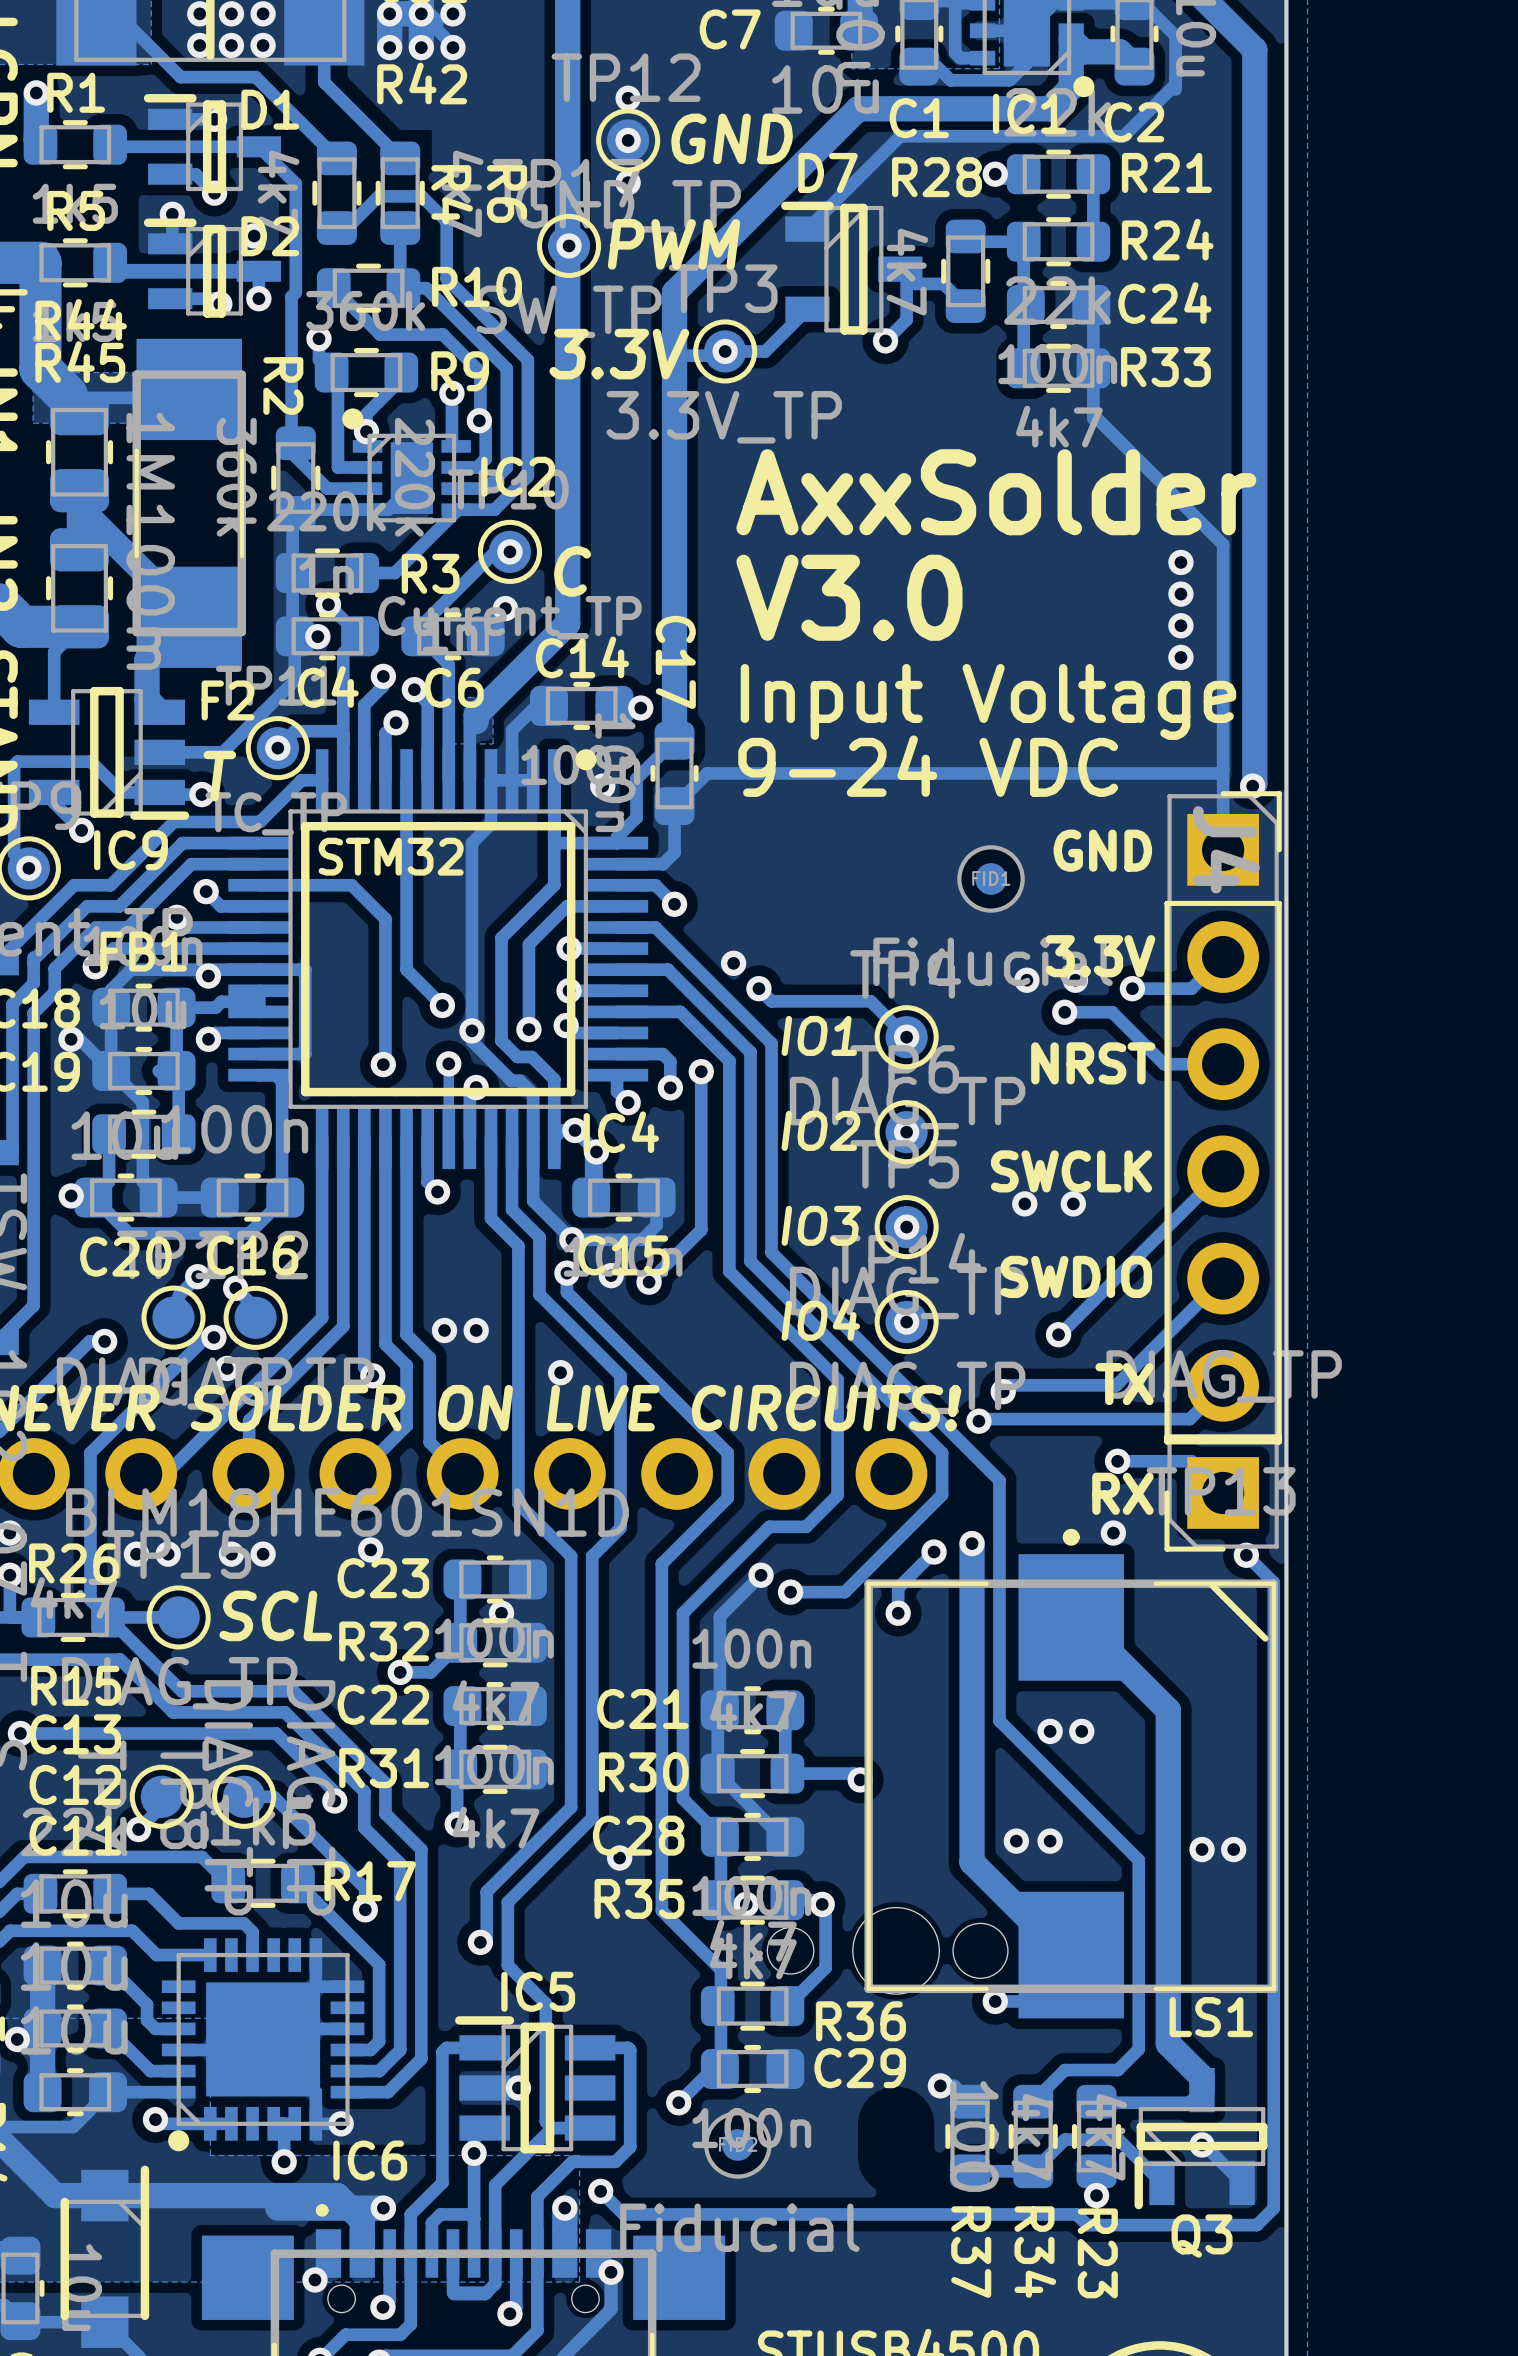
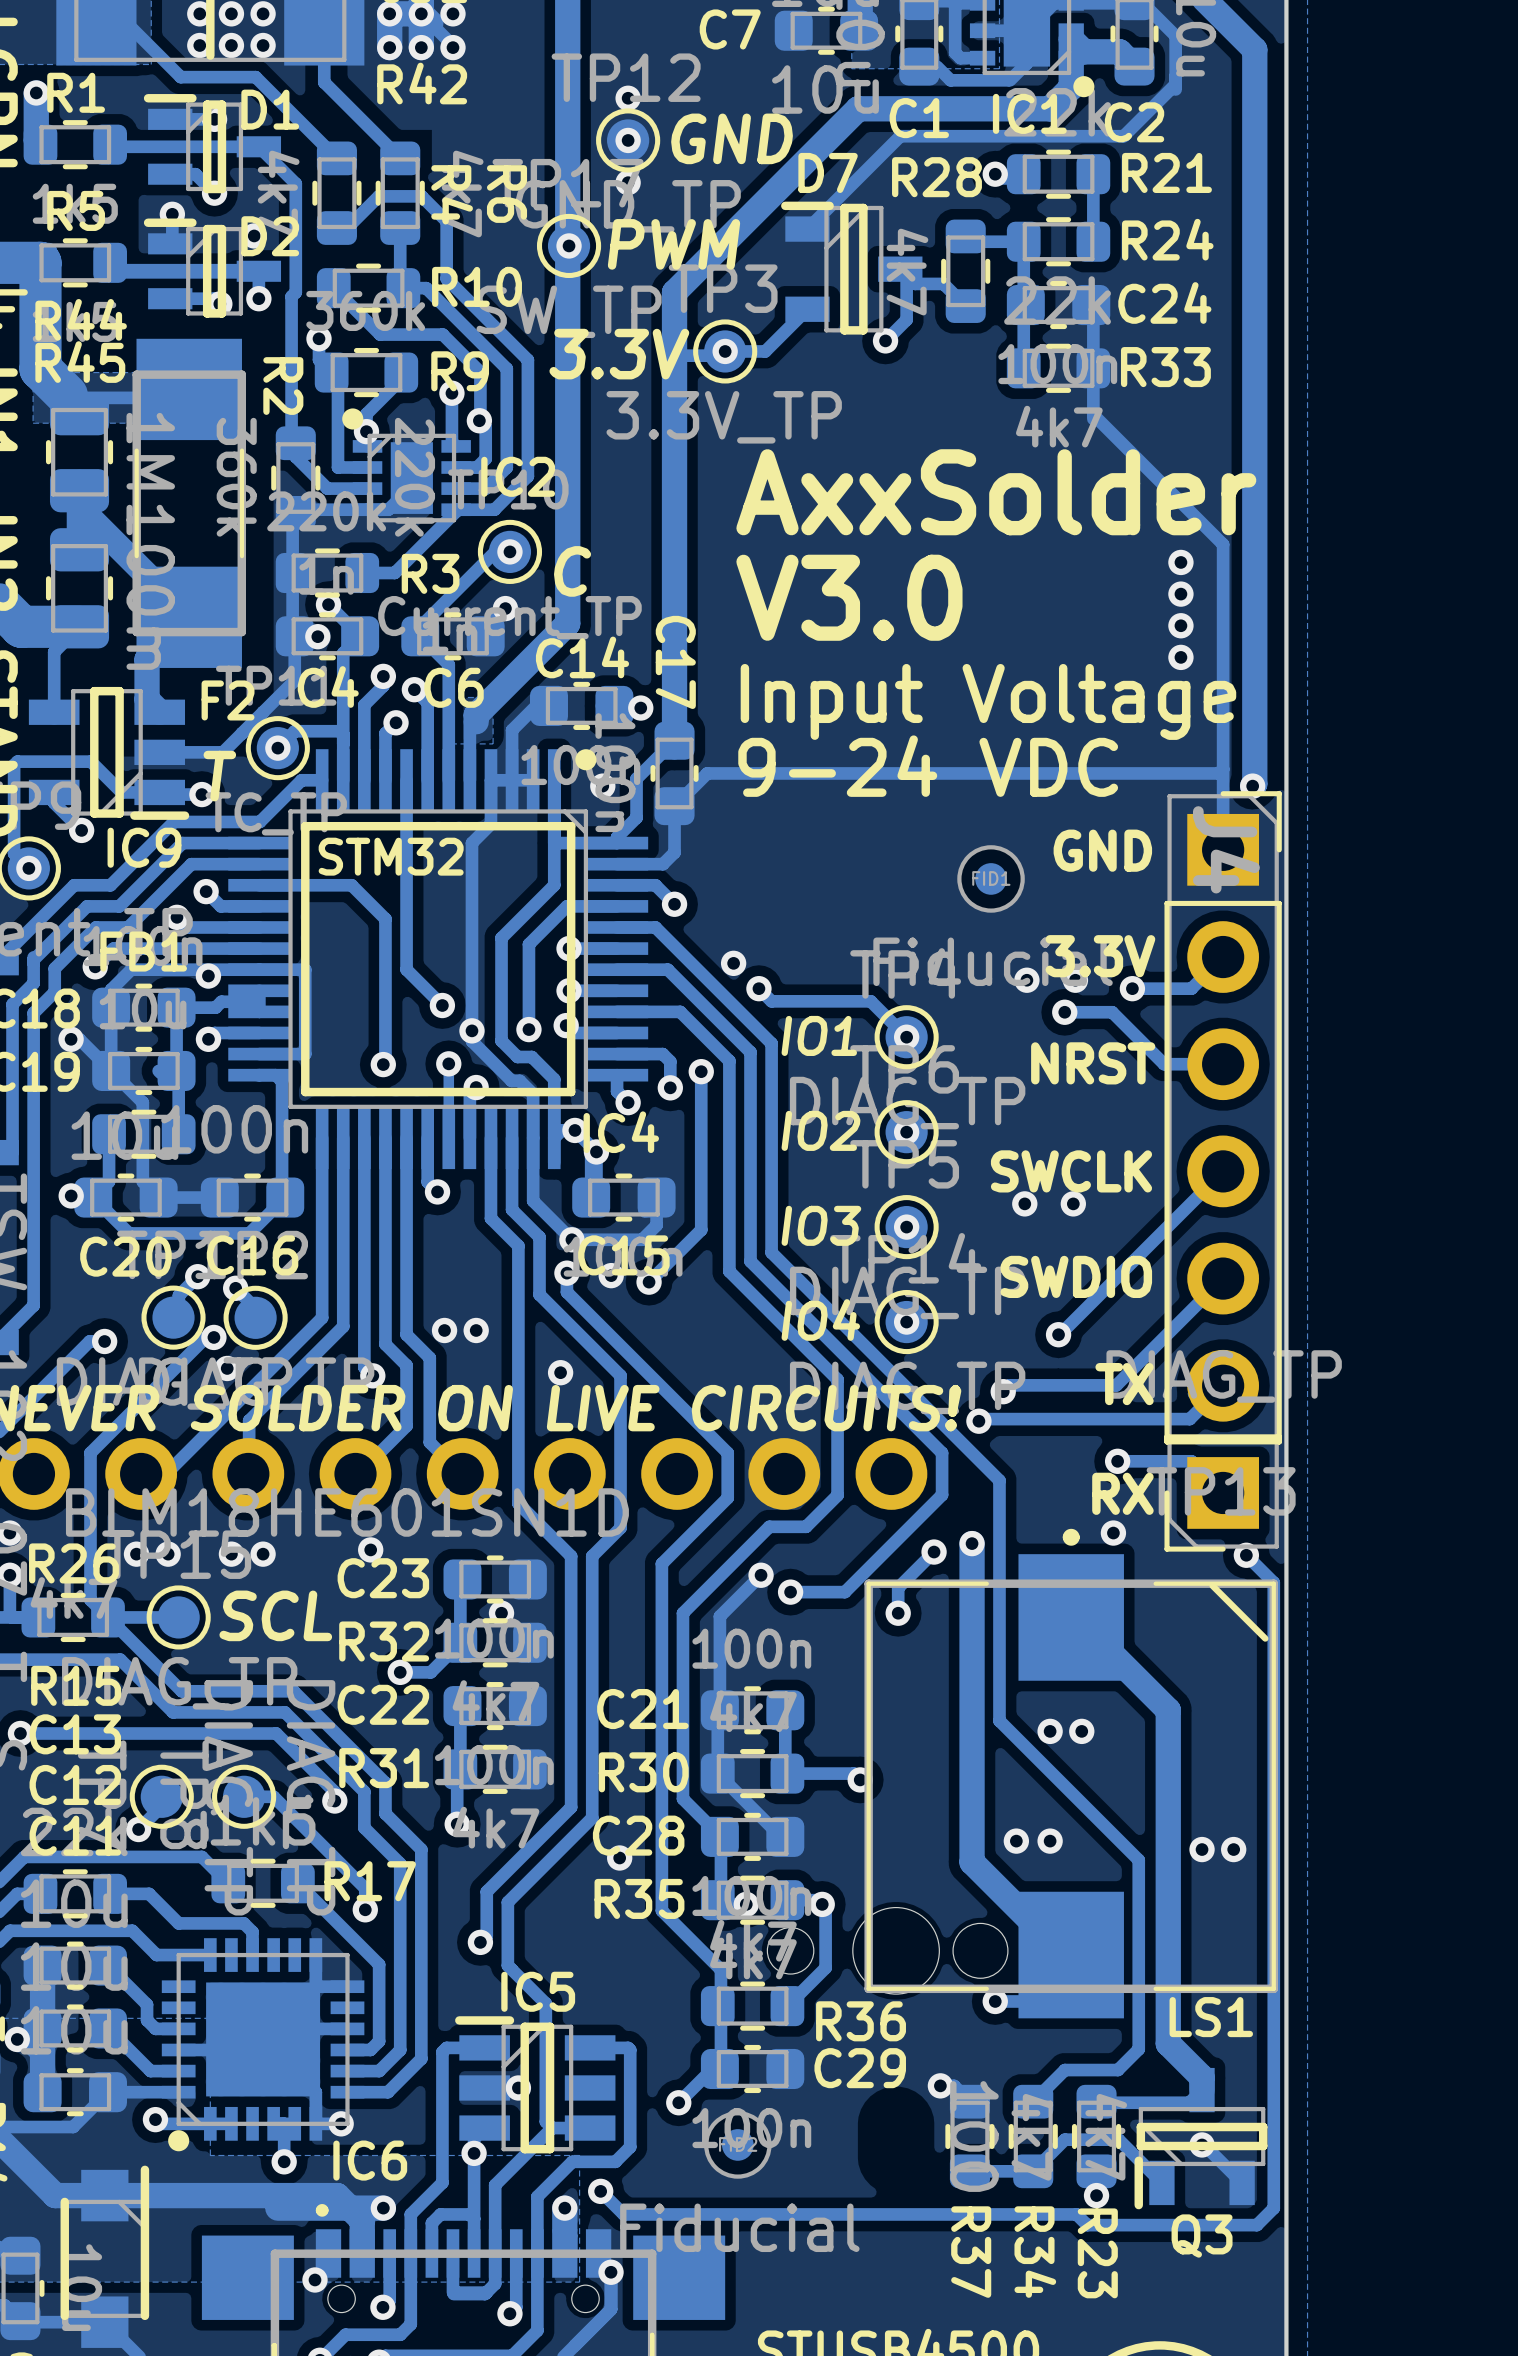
IC9 name position: IC9 (130, 850) -> IC9 (144, 847)

